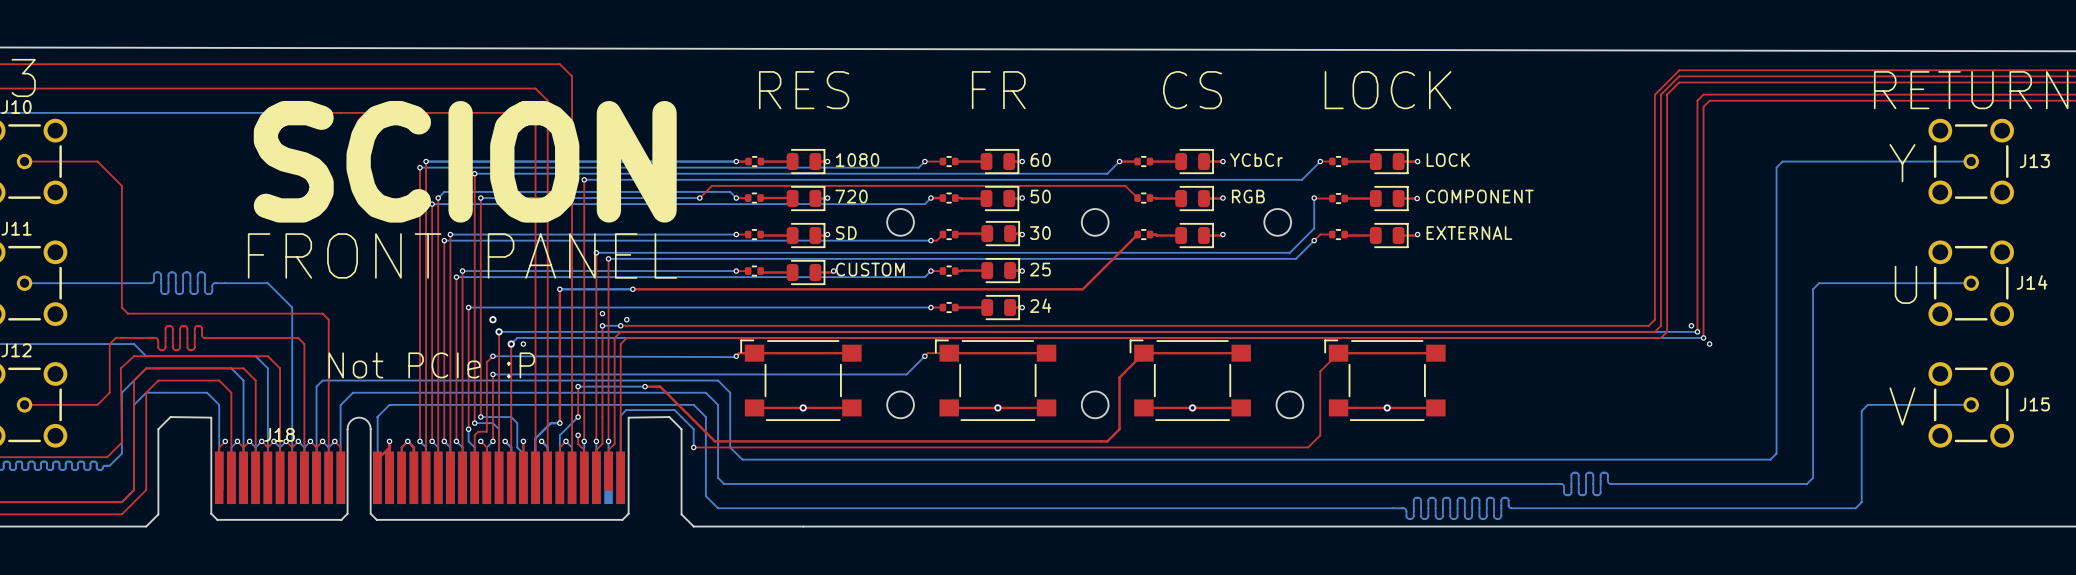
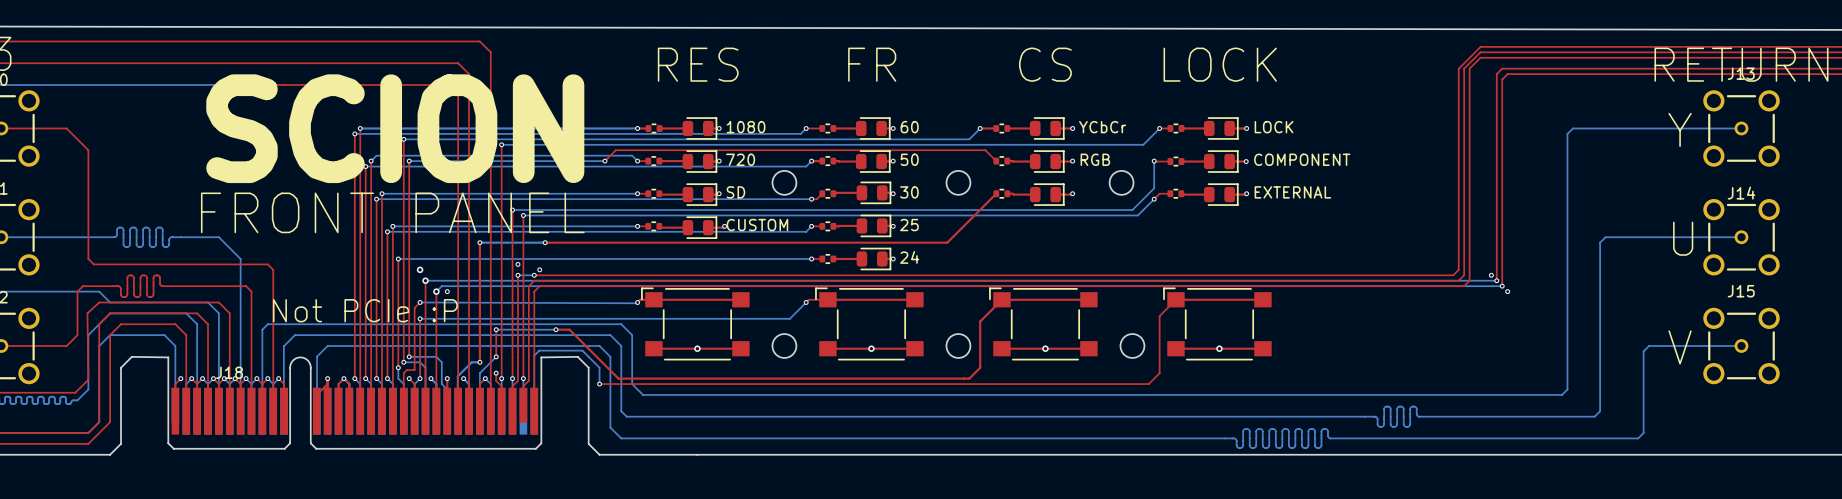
J13 name position: J13 (2034, 161) -> J13 (1741, 73)
J14 name position: J14 (2032, 282) -> J14 (1741, 193)
J15 name position: J15 (2034, 404) -> J15 (1741, 291)

